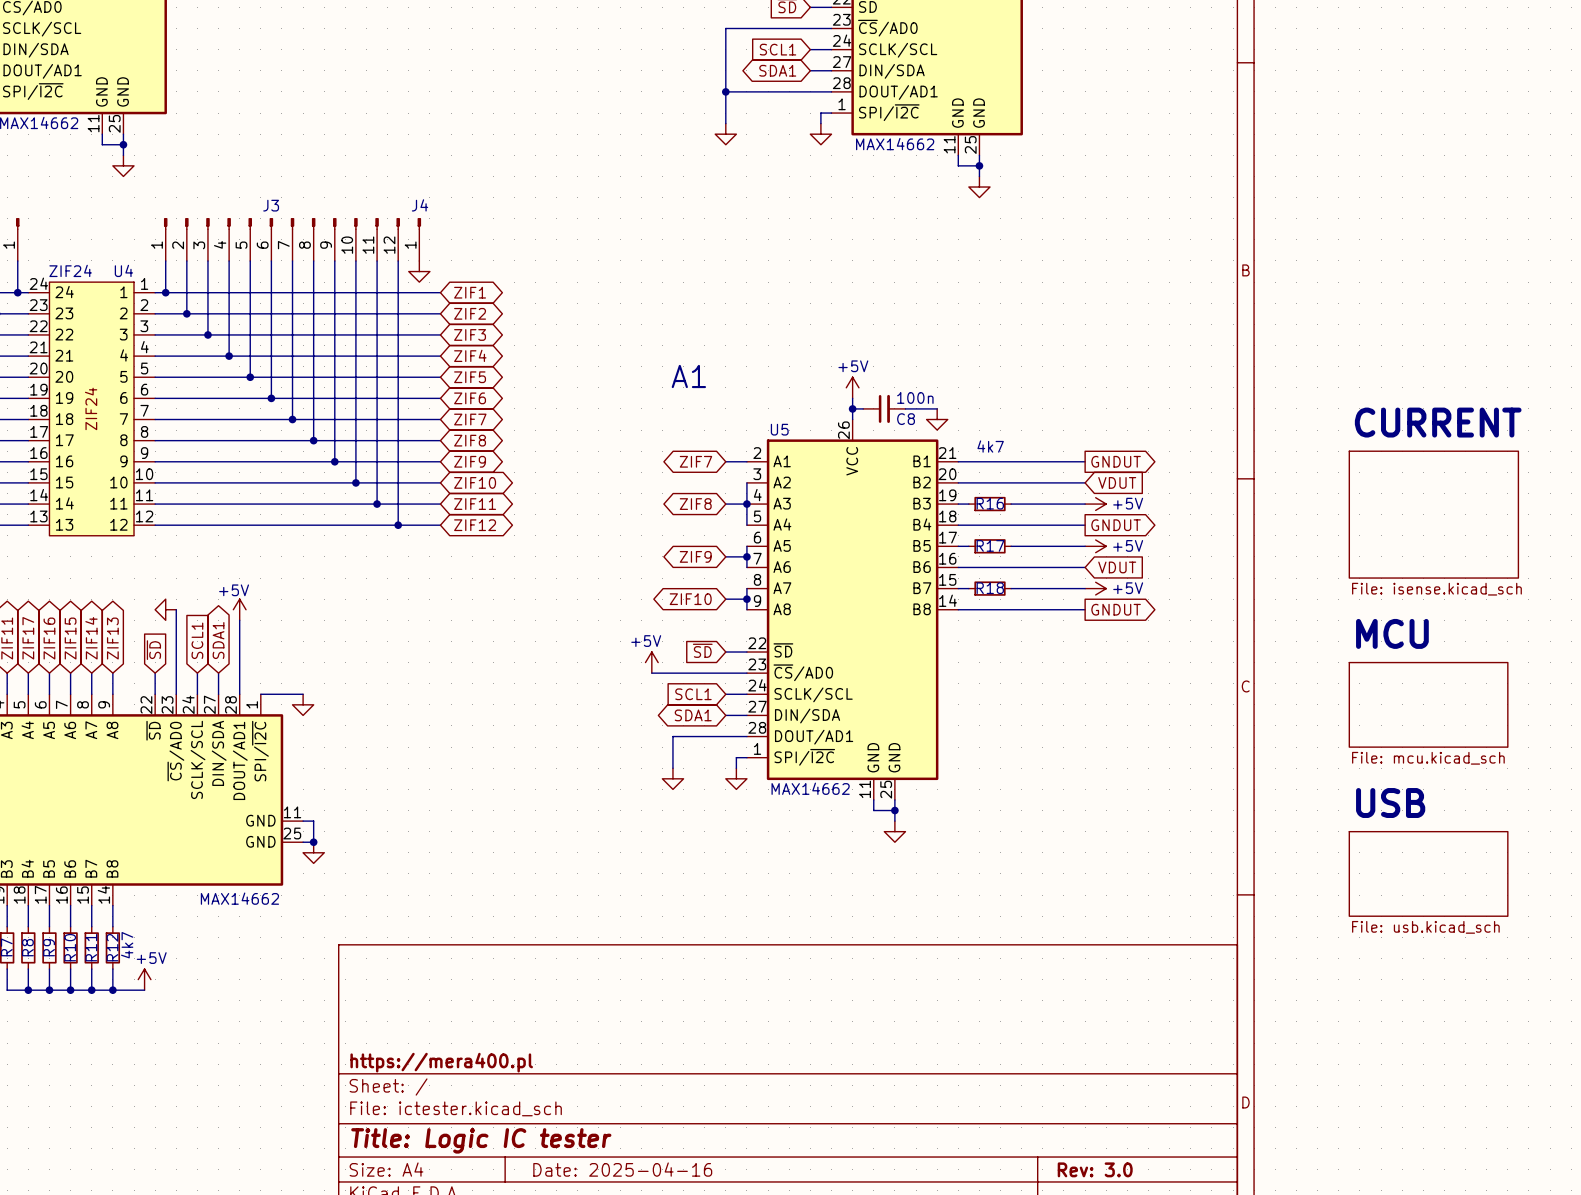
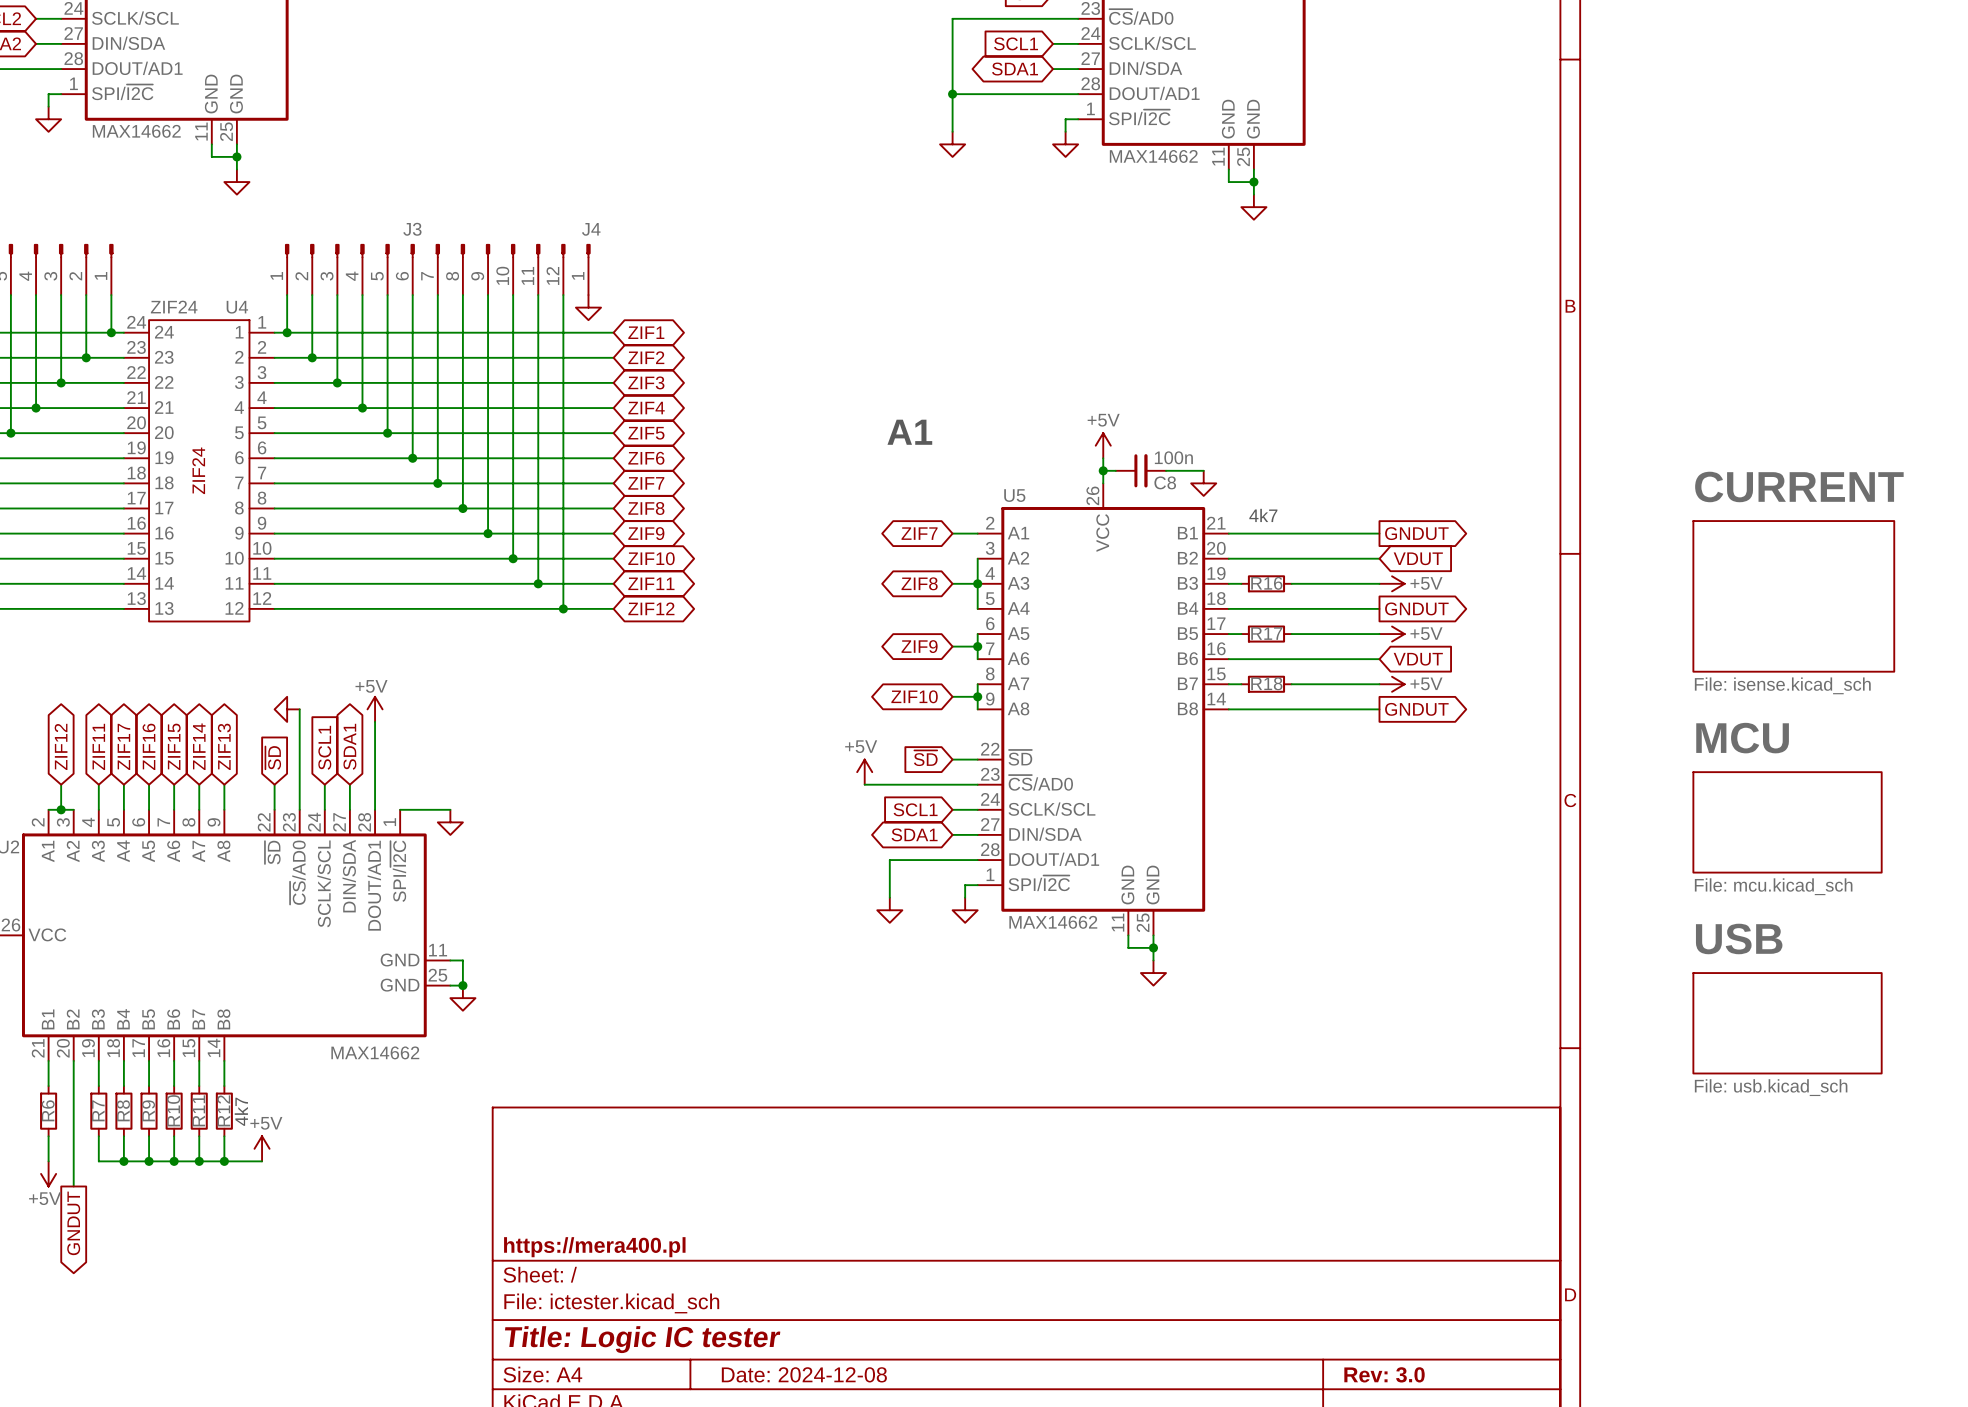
title block: Date: 2025-04-16 (622, 1169) -> Date: 2024-12-08 (804, 1374)

